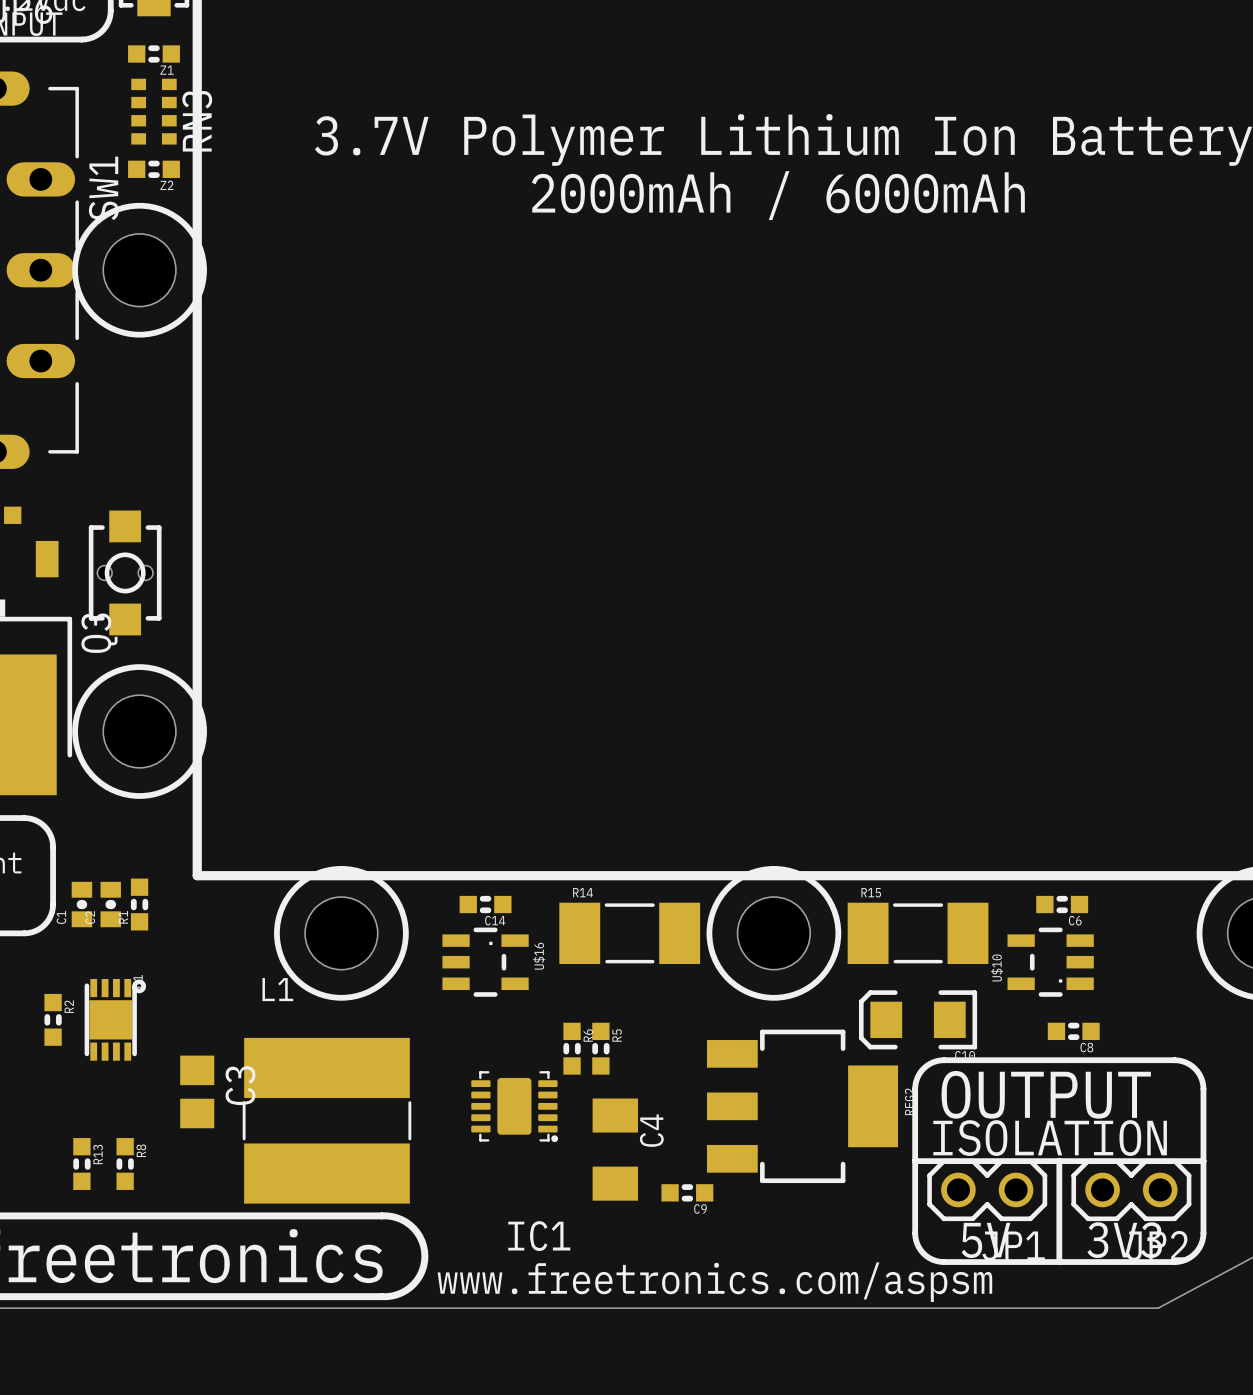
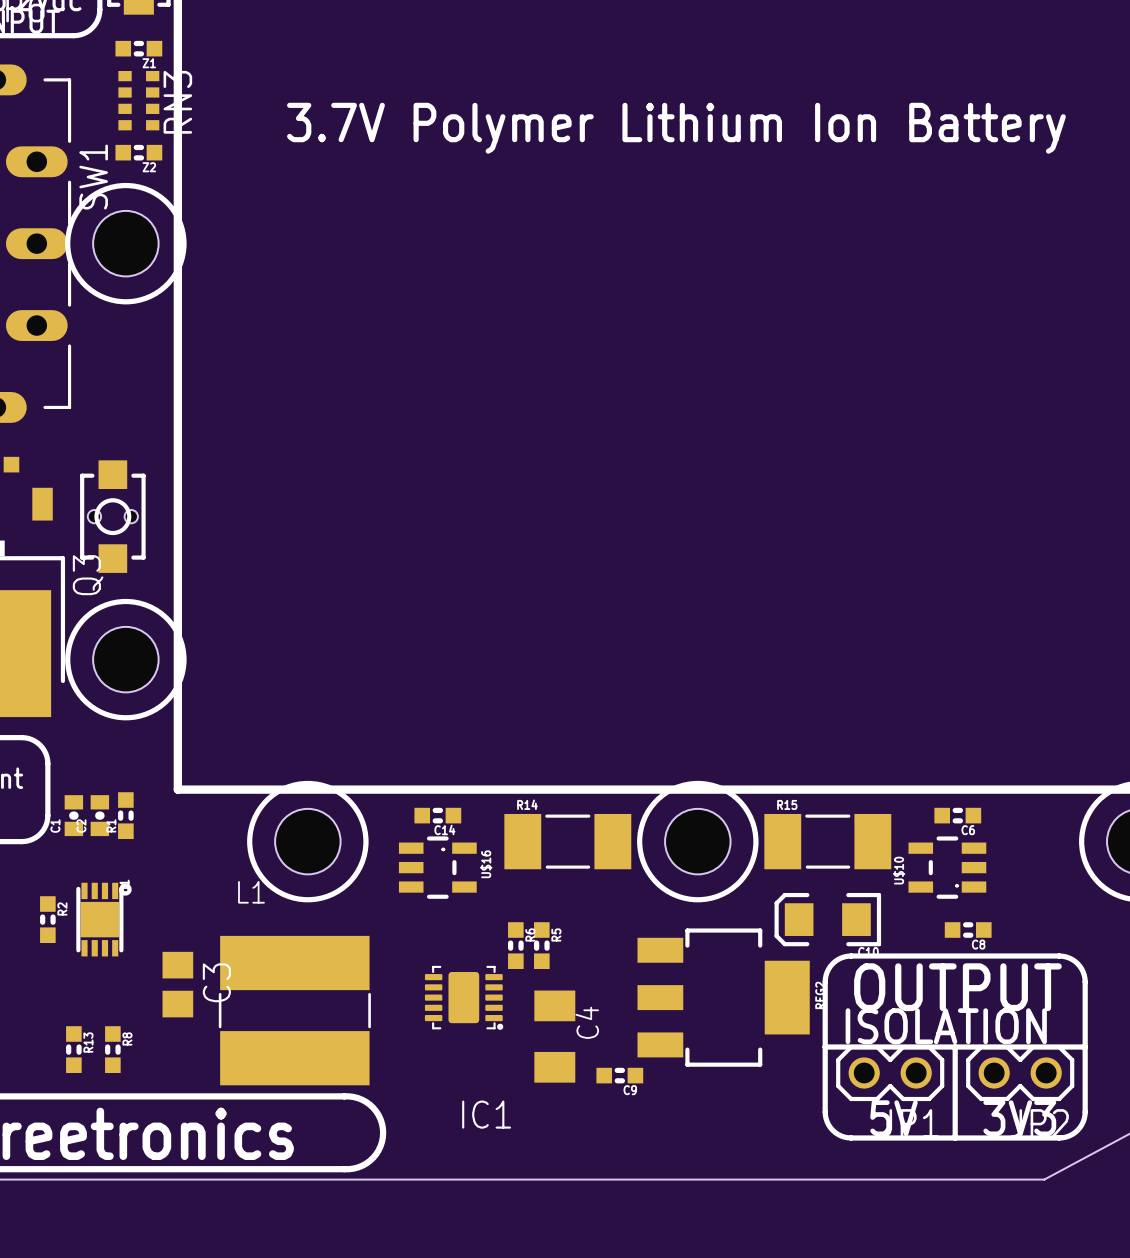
text: 2000mAh / 6000mAh (778, 195) -> none
text: www.freetronics.com/aspsm (714, 1282) -> none

